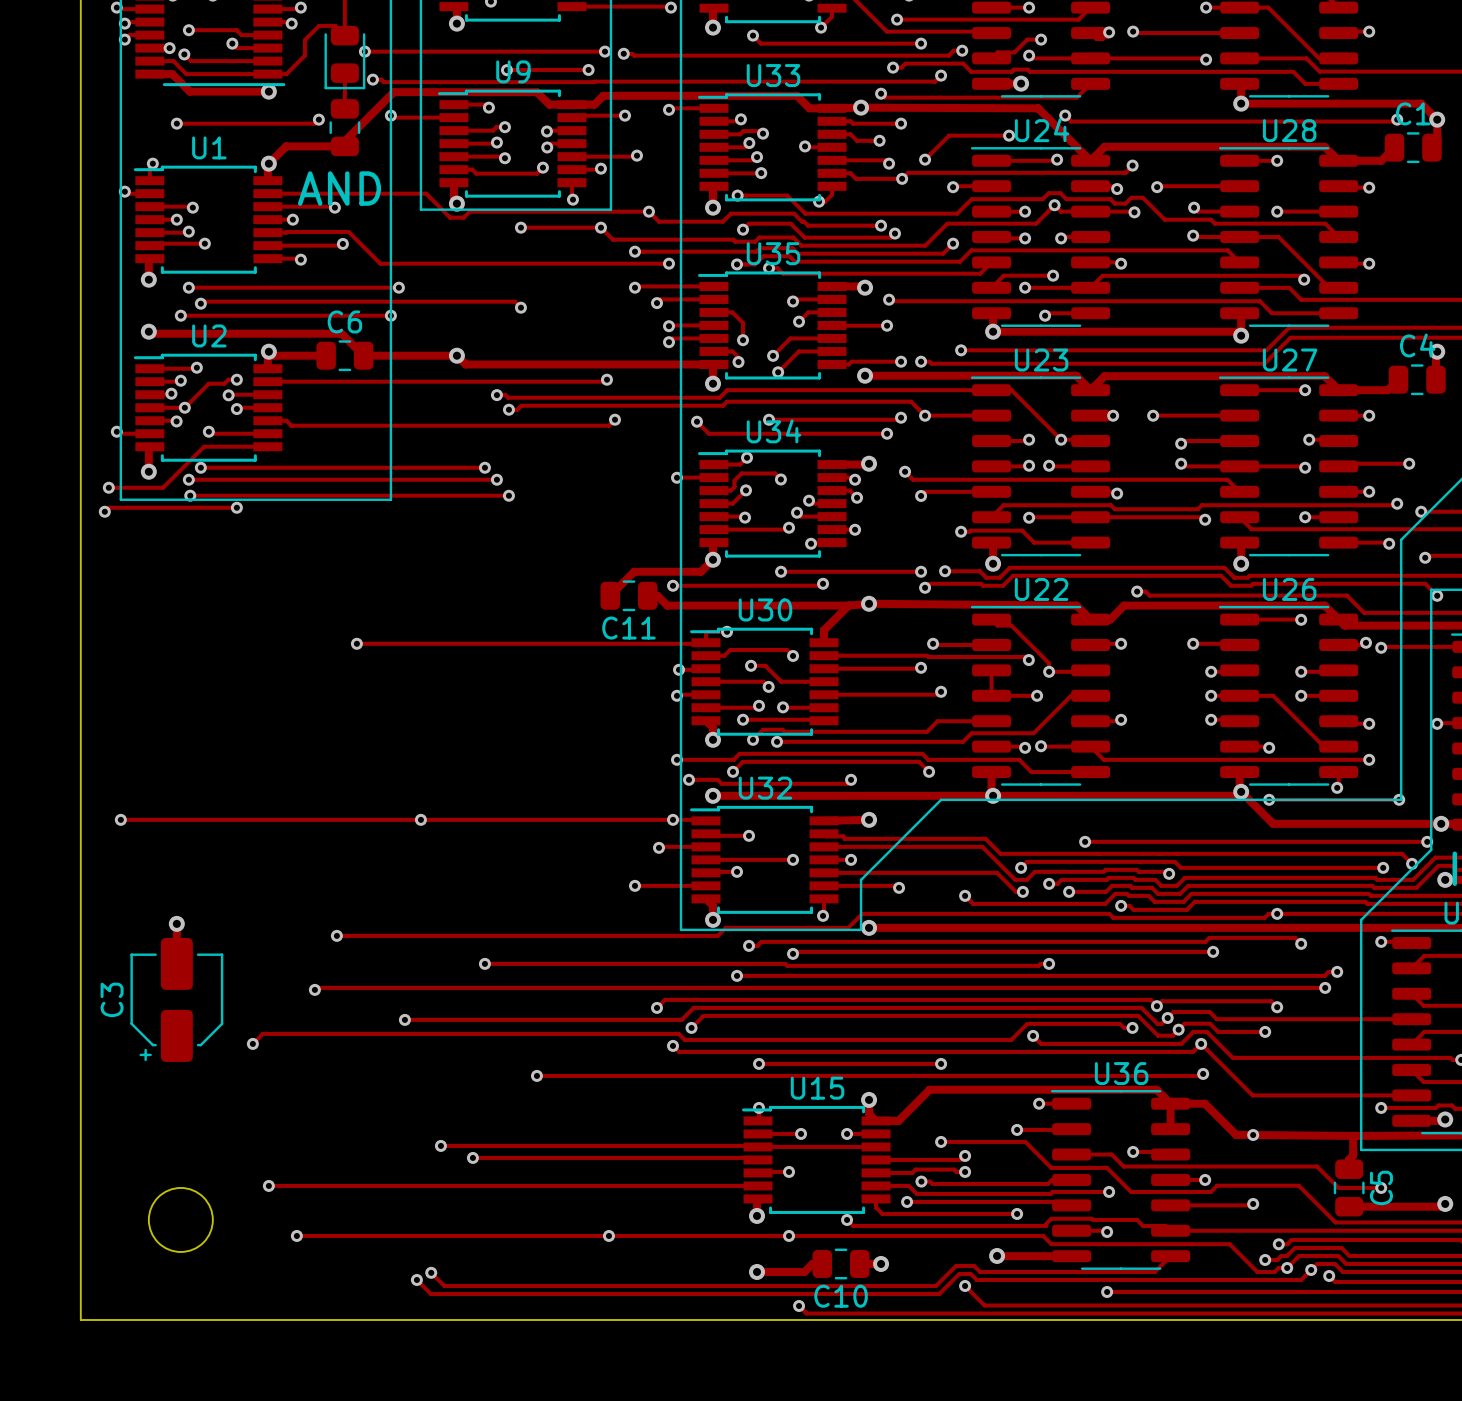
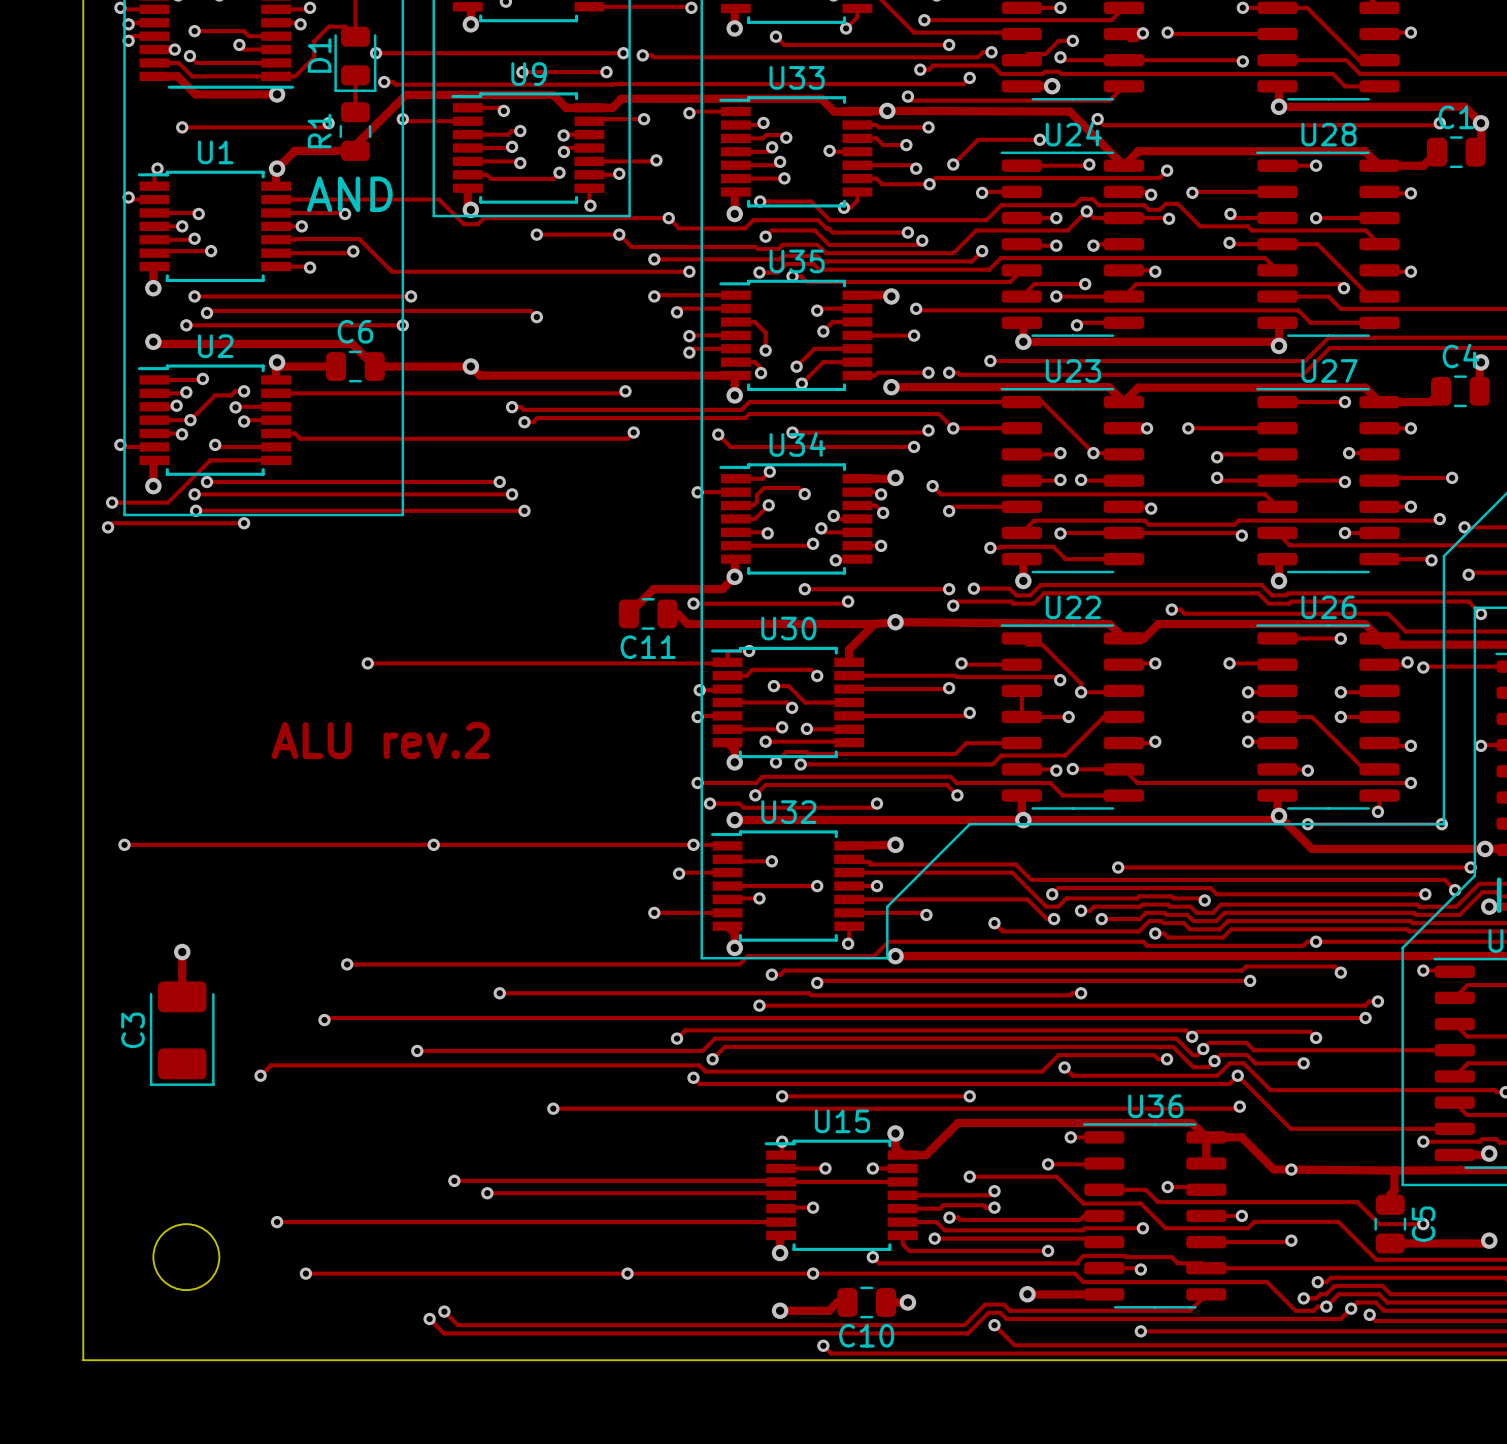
D1 name: none -> D1 (319, 55)
R1 name: none -> R1 (319, 131)
text: none -> ALU rev.2 (380, 740)
C3 footprint: [130, 937, 224, 1062] -> [149, 981, 215, 1086]

